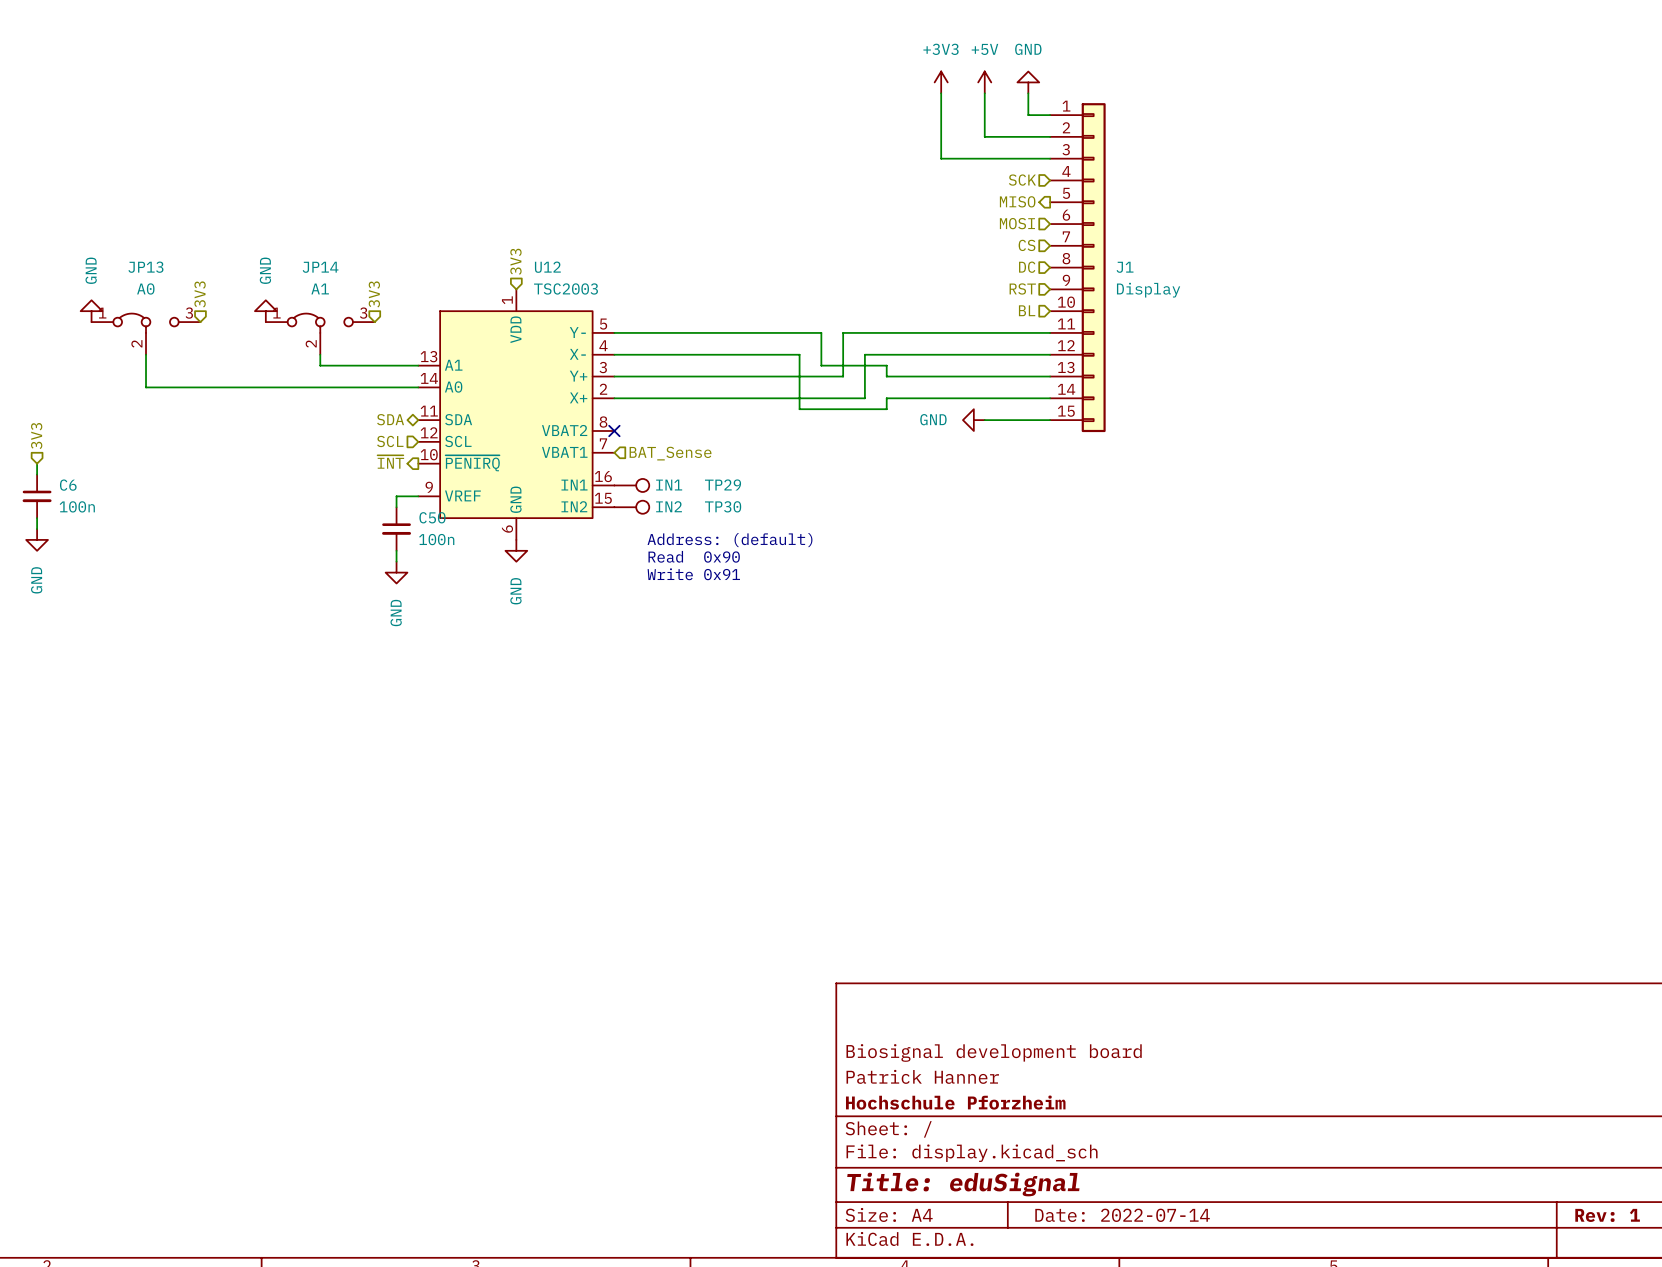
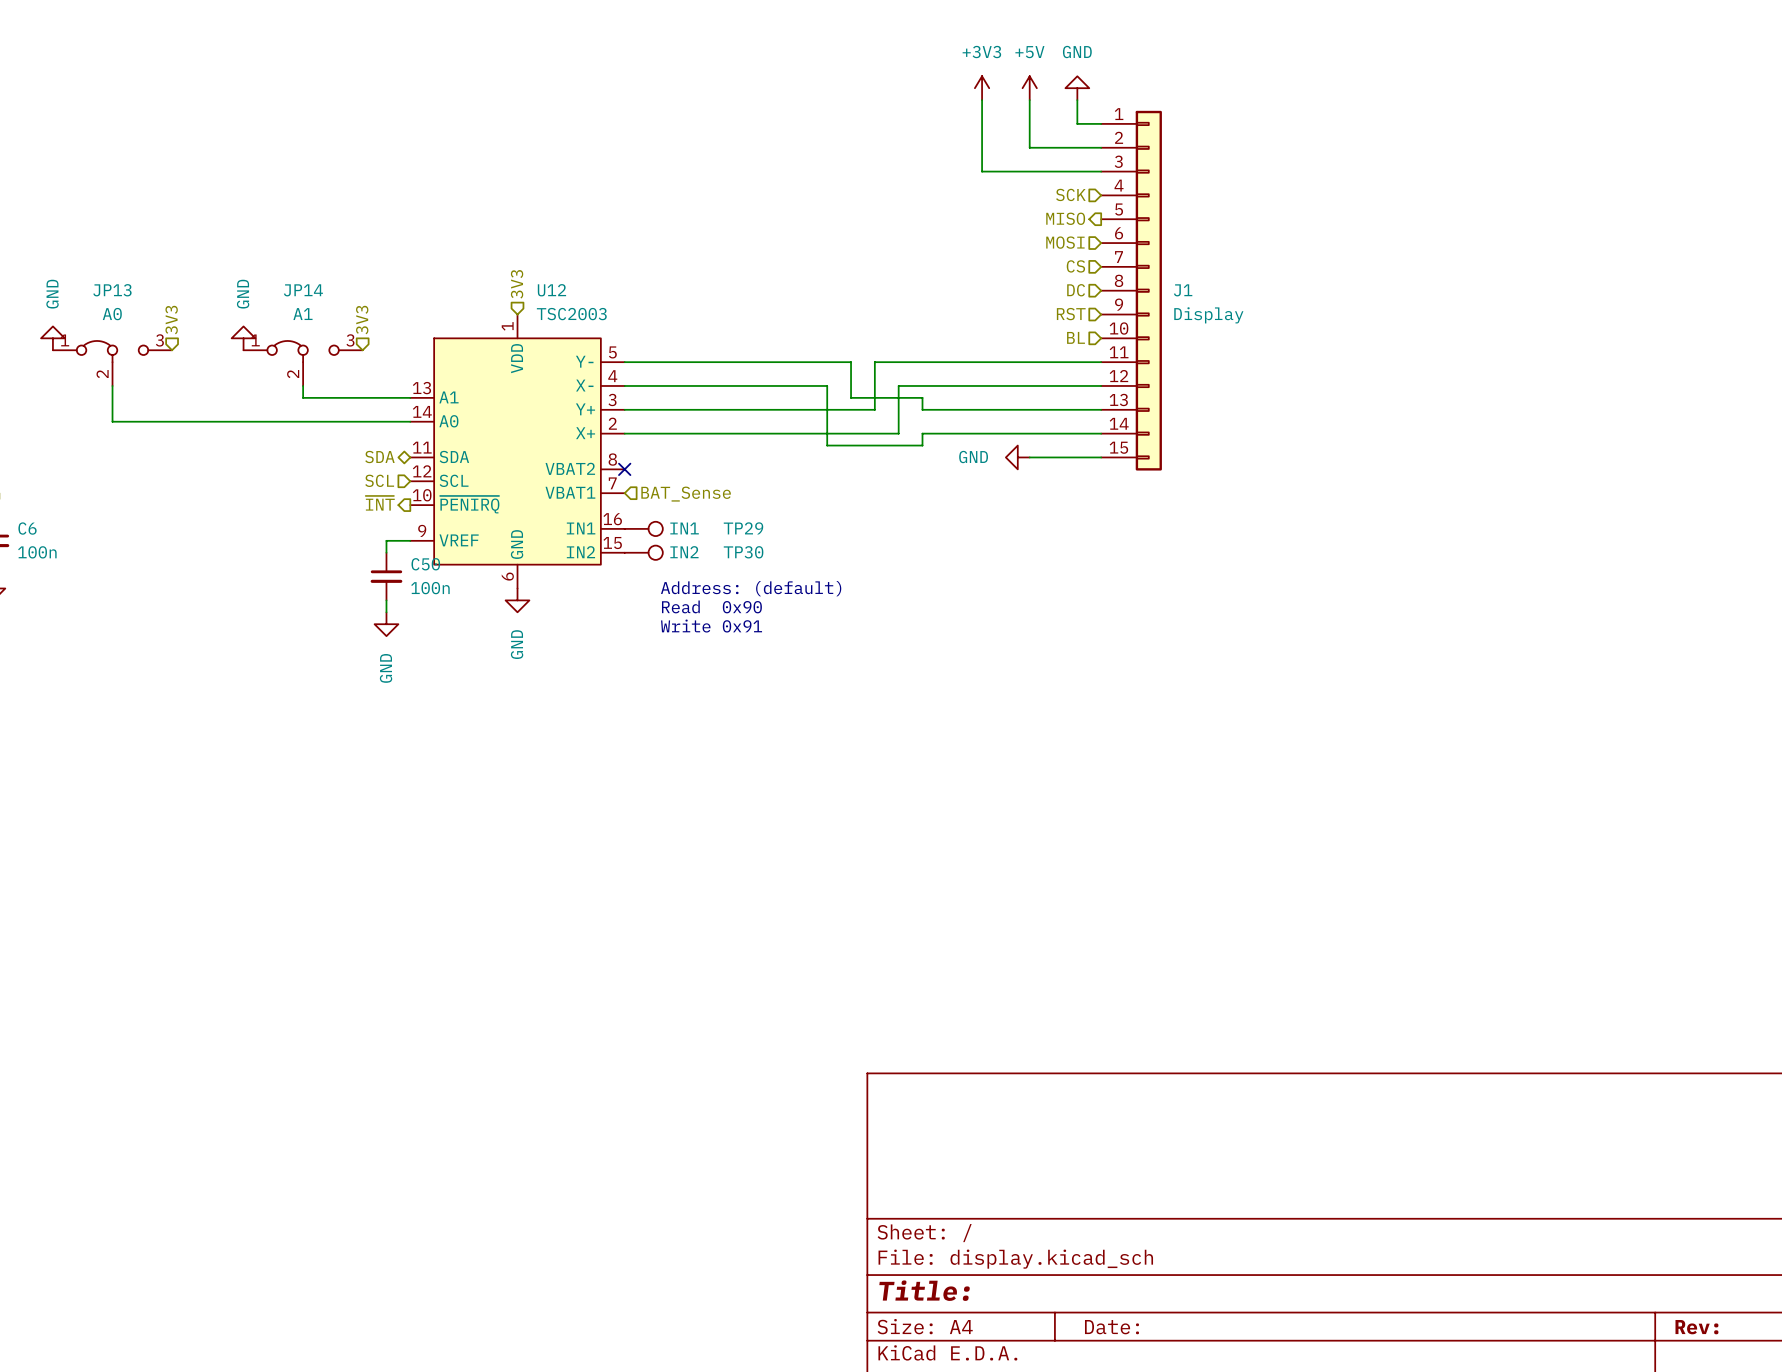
title block: Biosignal development board (994, 1052) -> none
title block: Patrick Hanner (922, 1076) -> none
title block: Hochschule Pforzheim (955, 1102) -> none
title block: Title: eduSignal (963, 1184) -> Title: (924, 1290)
title block: Date: 2022-07-14 (1122, 1215) -> Date: (1111, 1327)
title block: Rev: 1 (1607, 1215) -> Rev: (1696, 1327)

